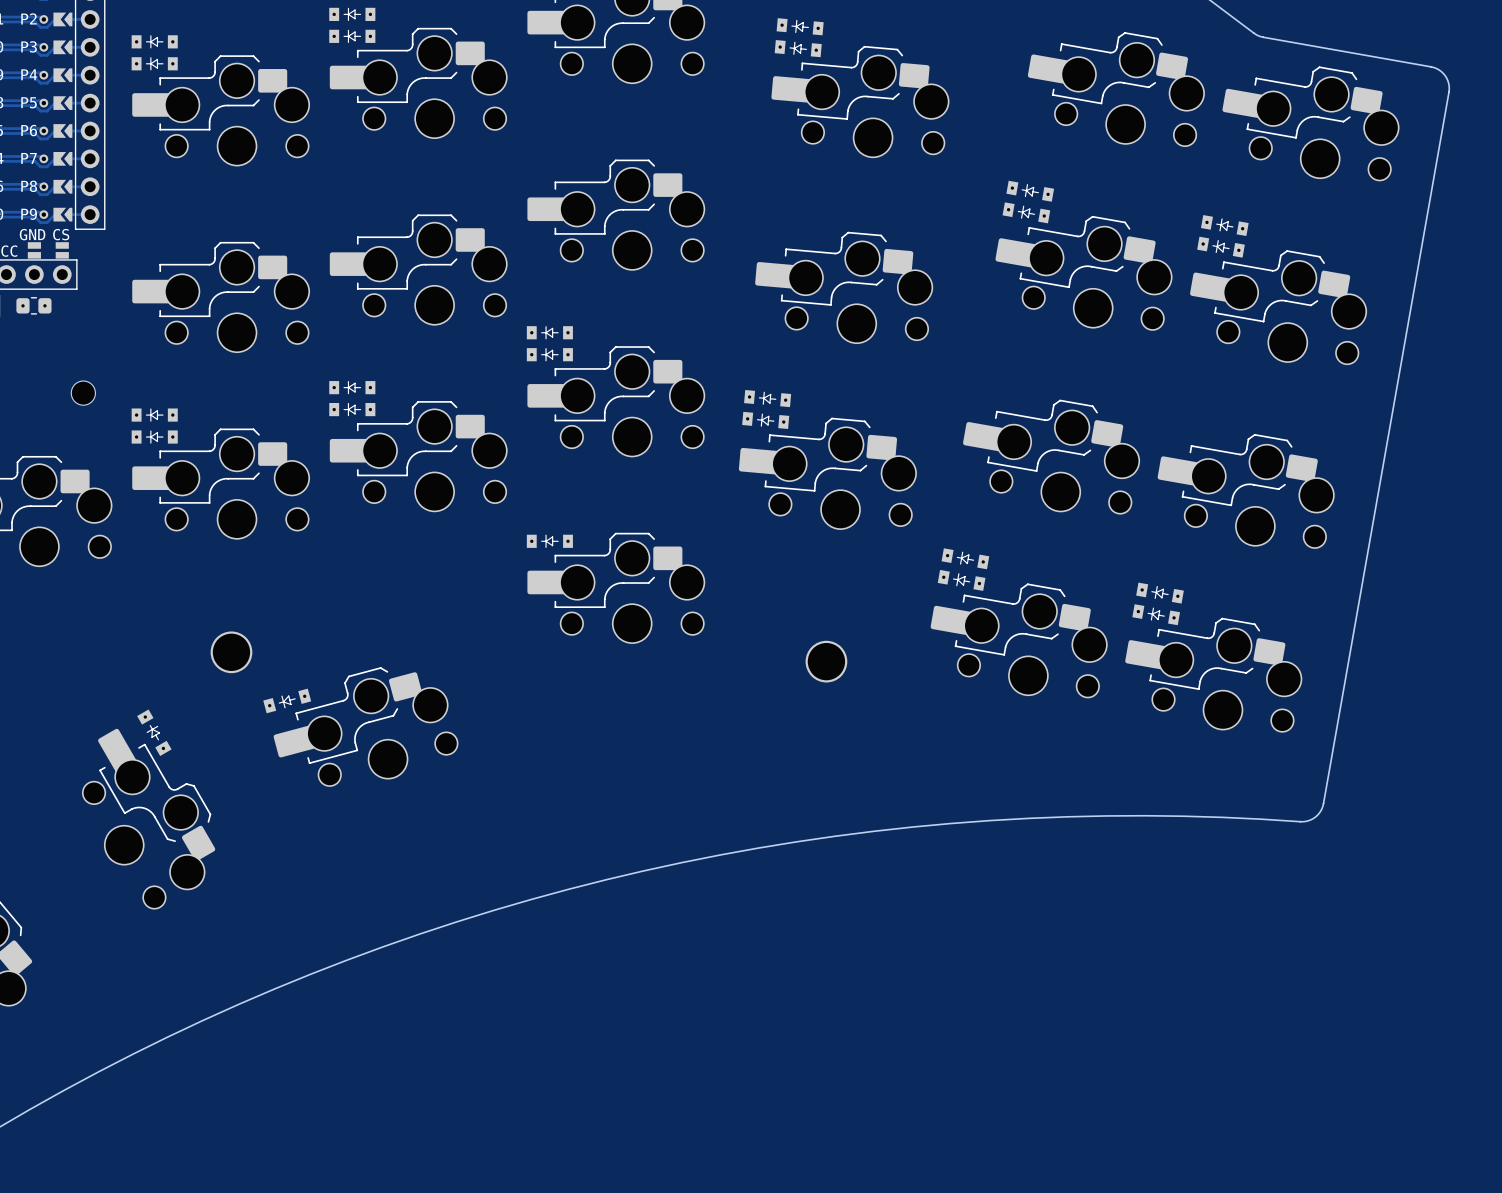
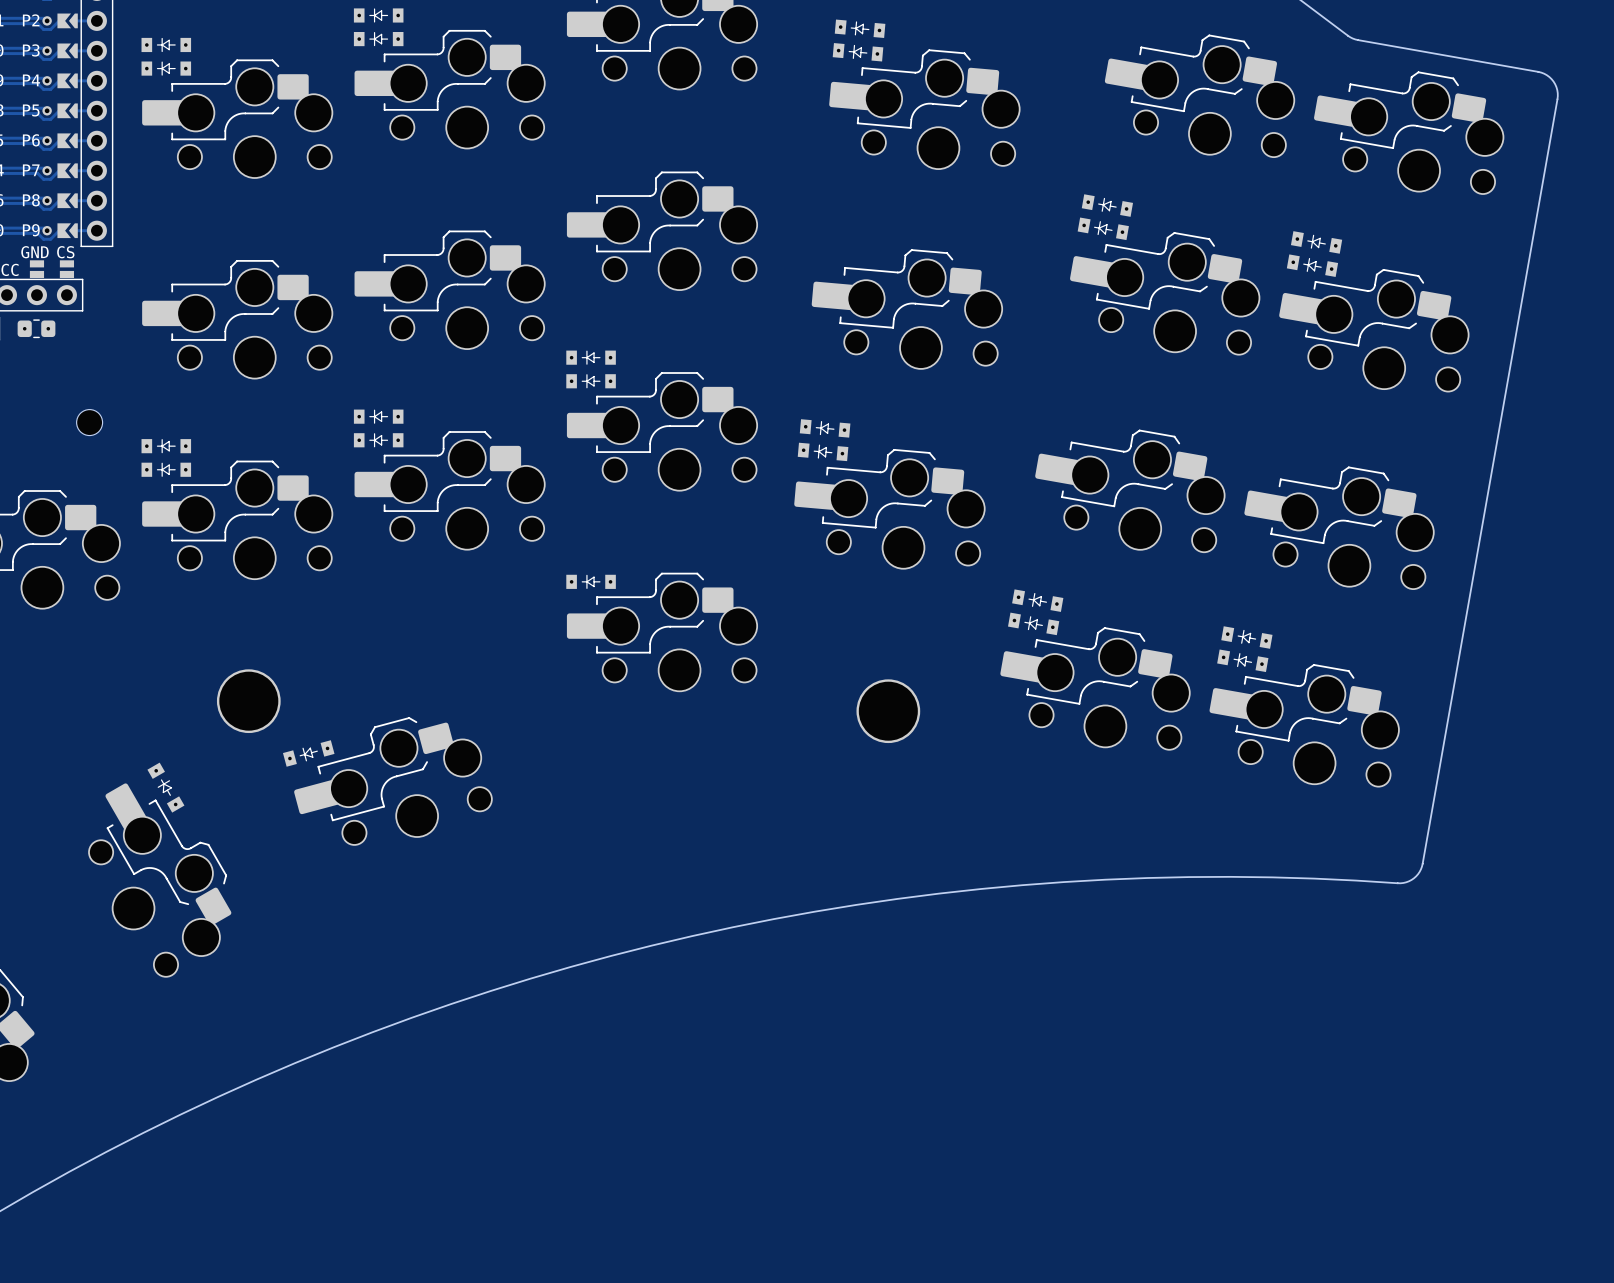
part footprint: [210, 631, 253, 674] -> [216, 669, 281, 734]
part footprint: [805, 640, 848, 683] -> [856, 679, 921, 744]

